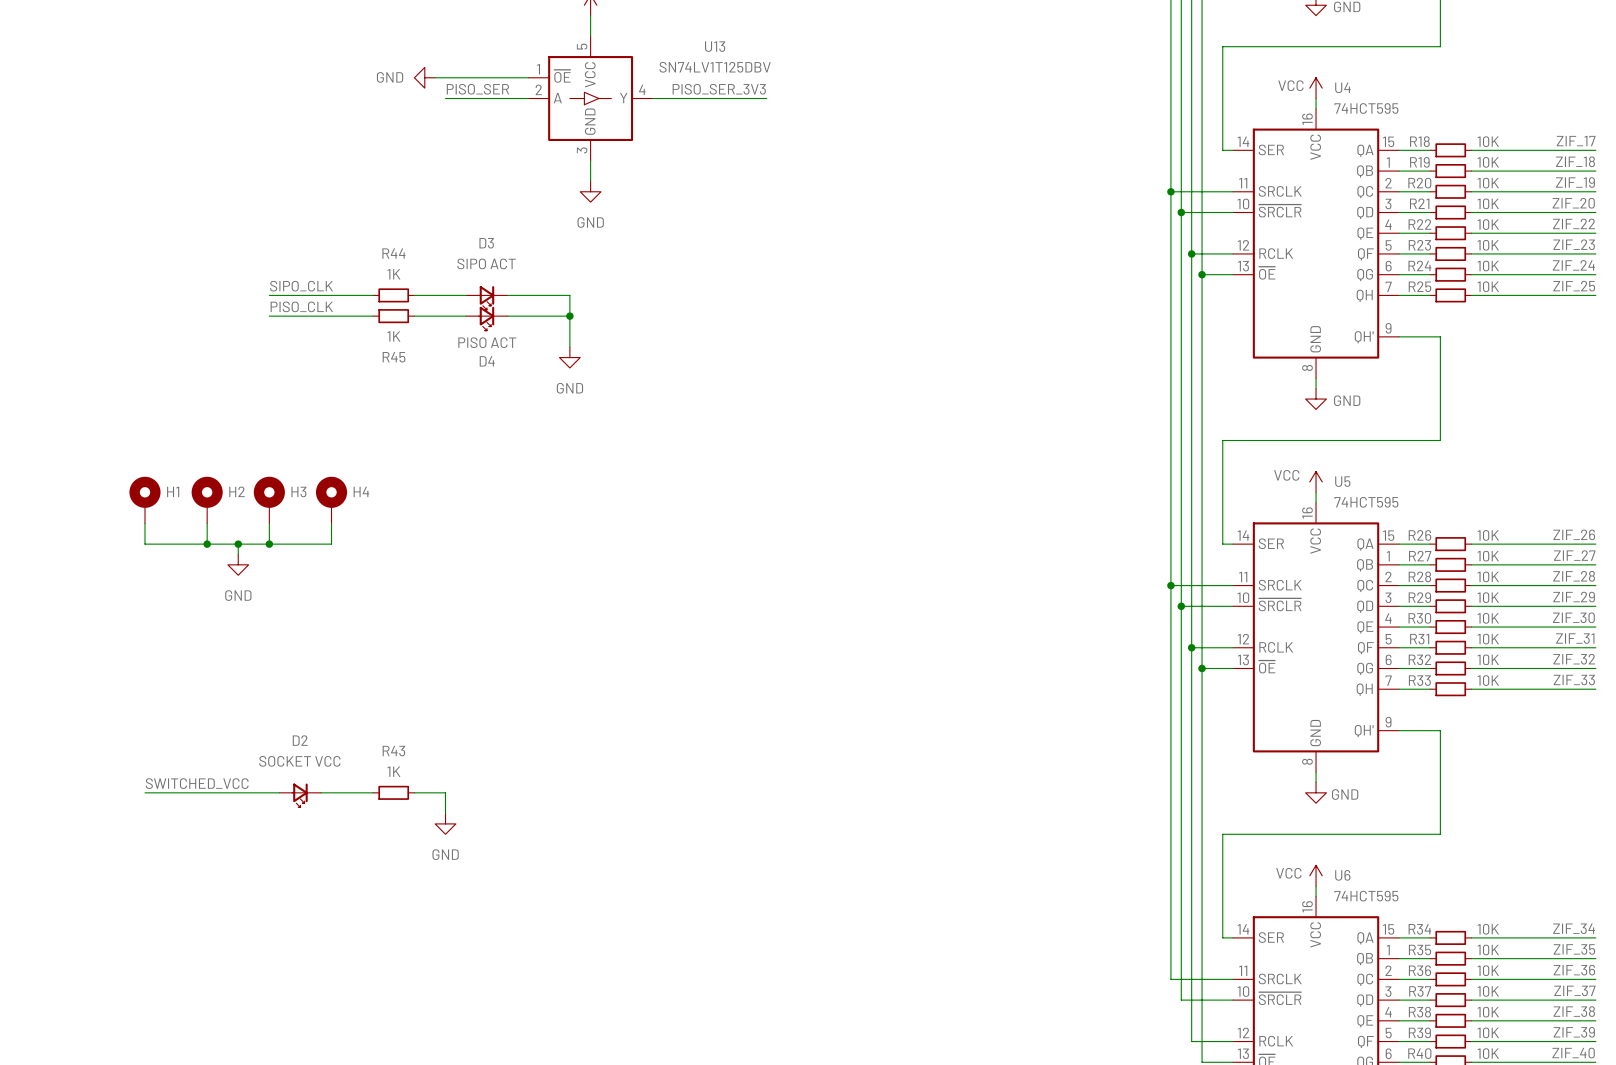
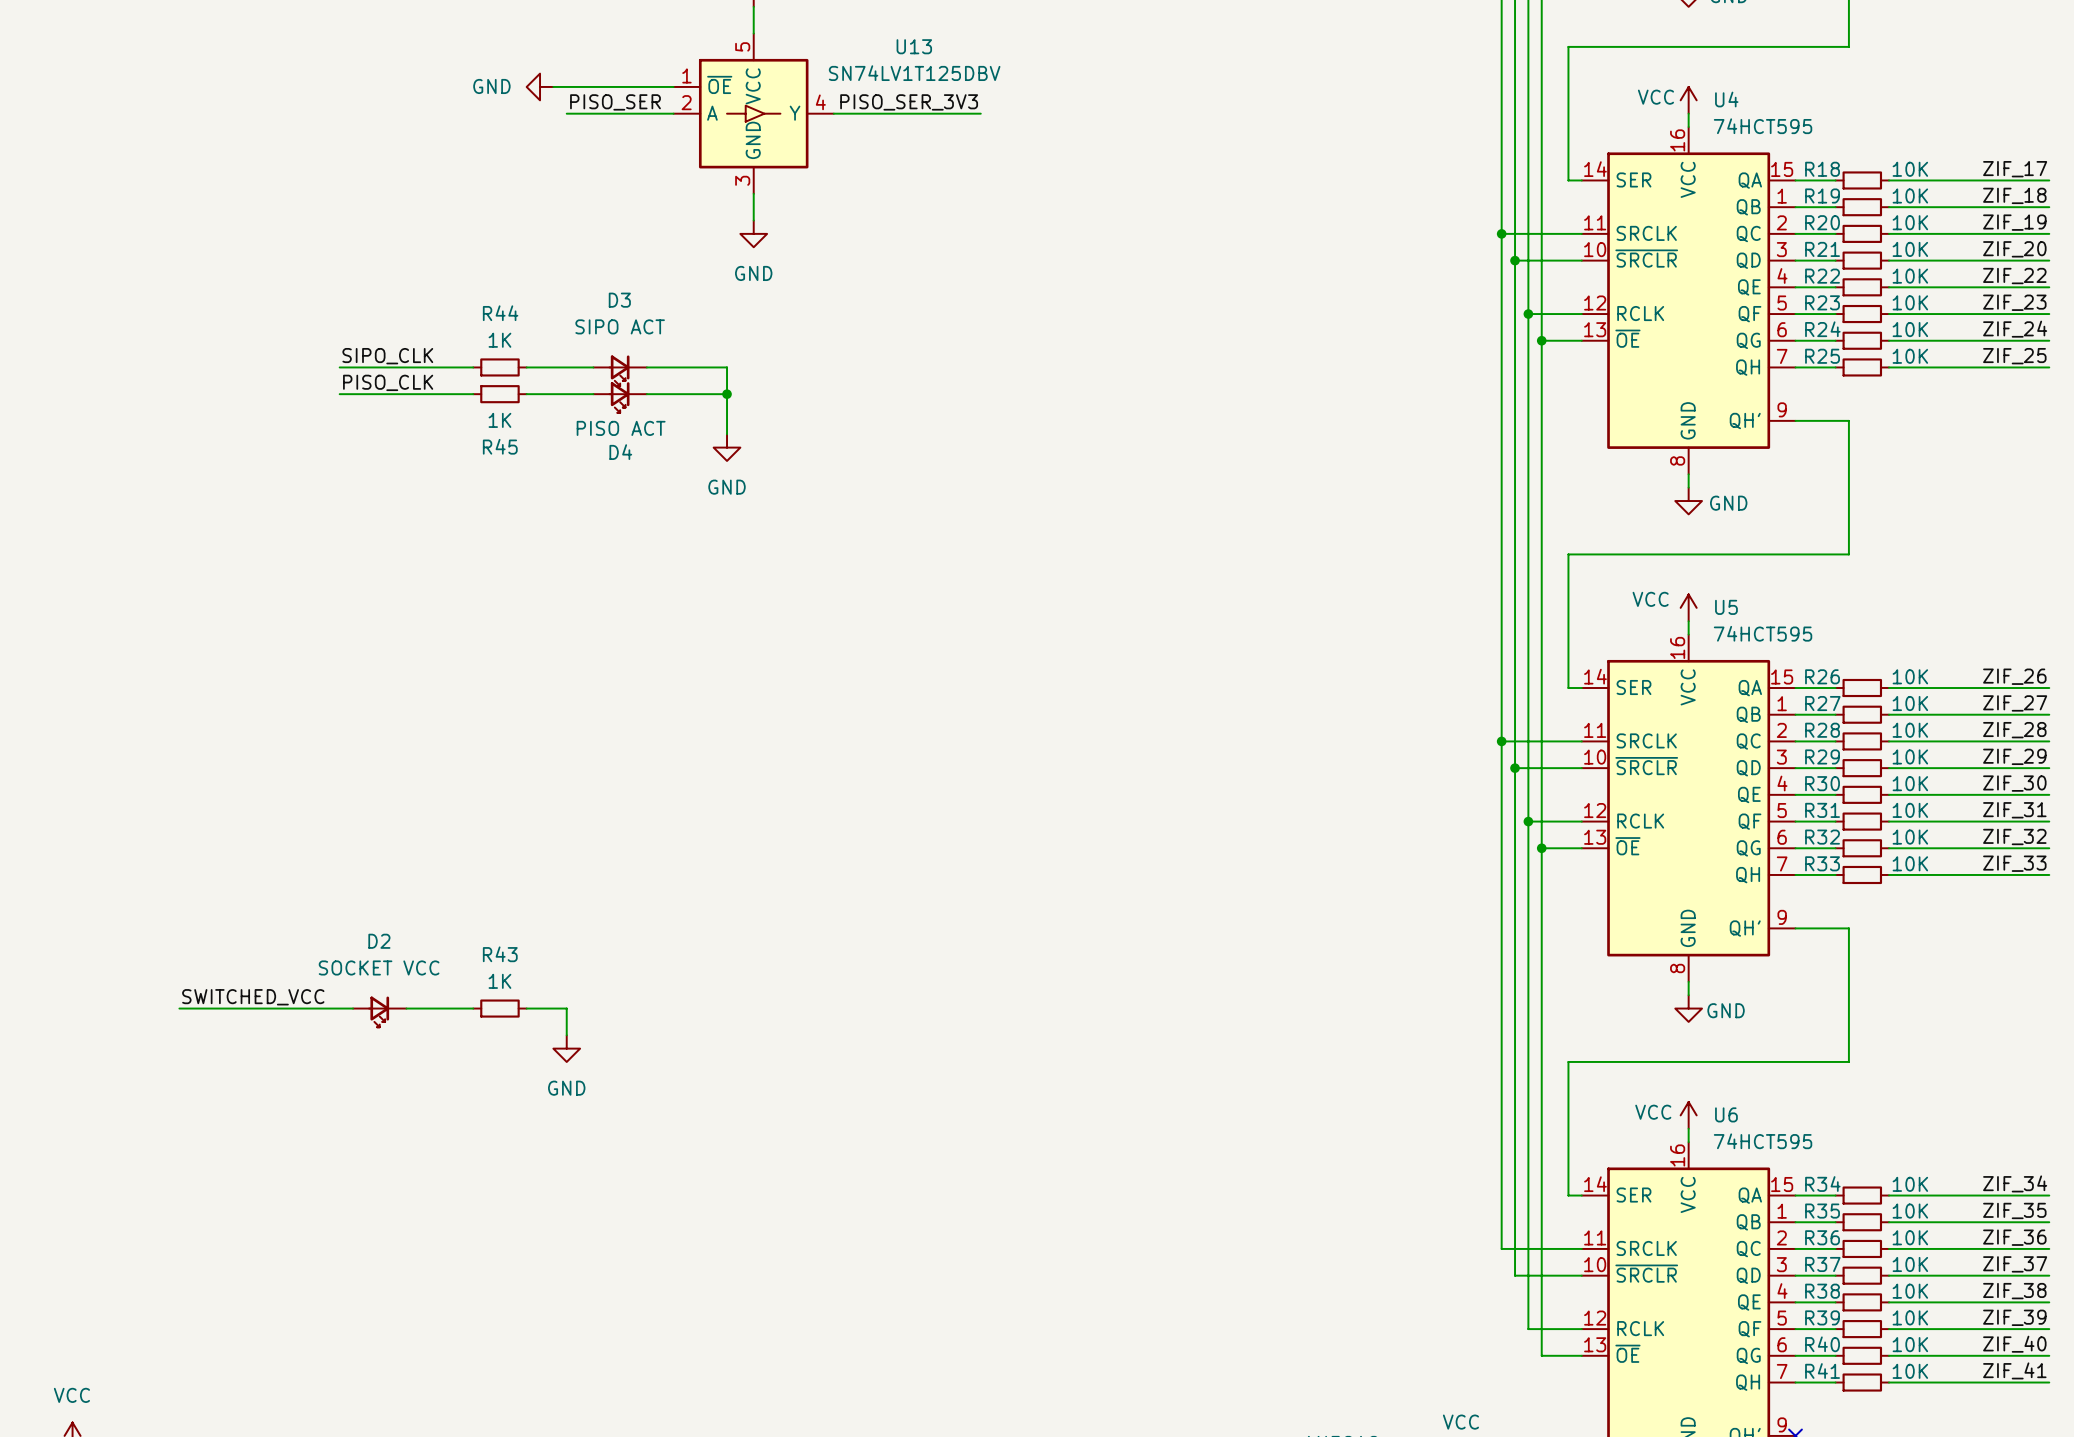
H1: (144, 500) -> none
H2: (207, 500) -> none
H3: (269, 500) -> none
H4: (331, 500) -> none
wire: (144, 523) (144, 544) (331, 544) (331, 523) -> none
wire: (207, 523) (207, 544) -> none
wire: (269, 523) (269, 544) -> none
junction: (207, 544) -> none
wire: (238, 544) (238, 554) -> none
junction: (238, 544) -> none
junction: (269, 544) -> none
power symbol: GND (238, 564) -> none

